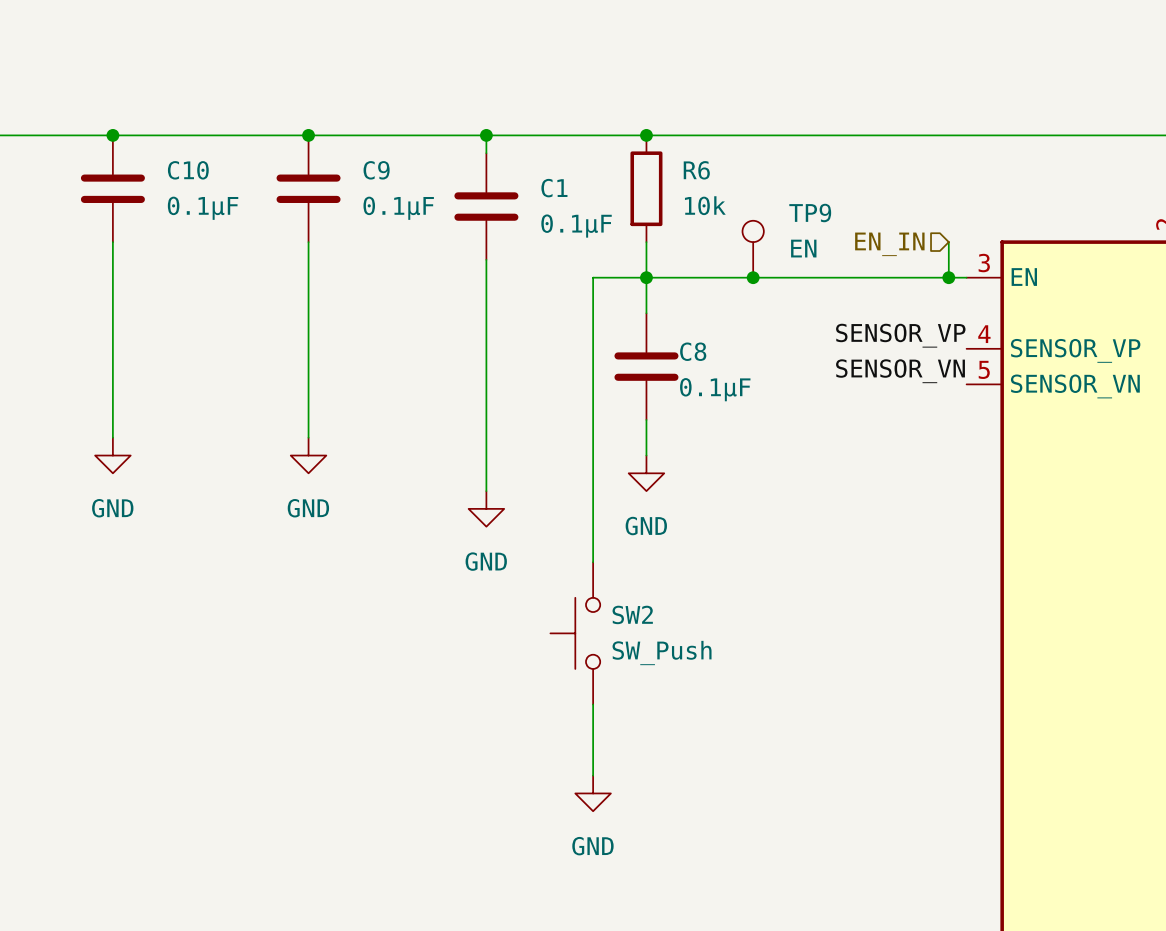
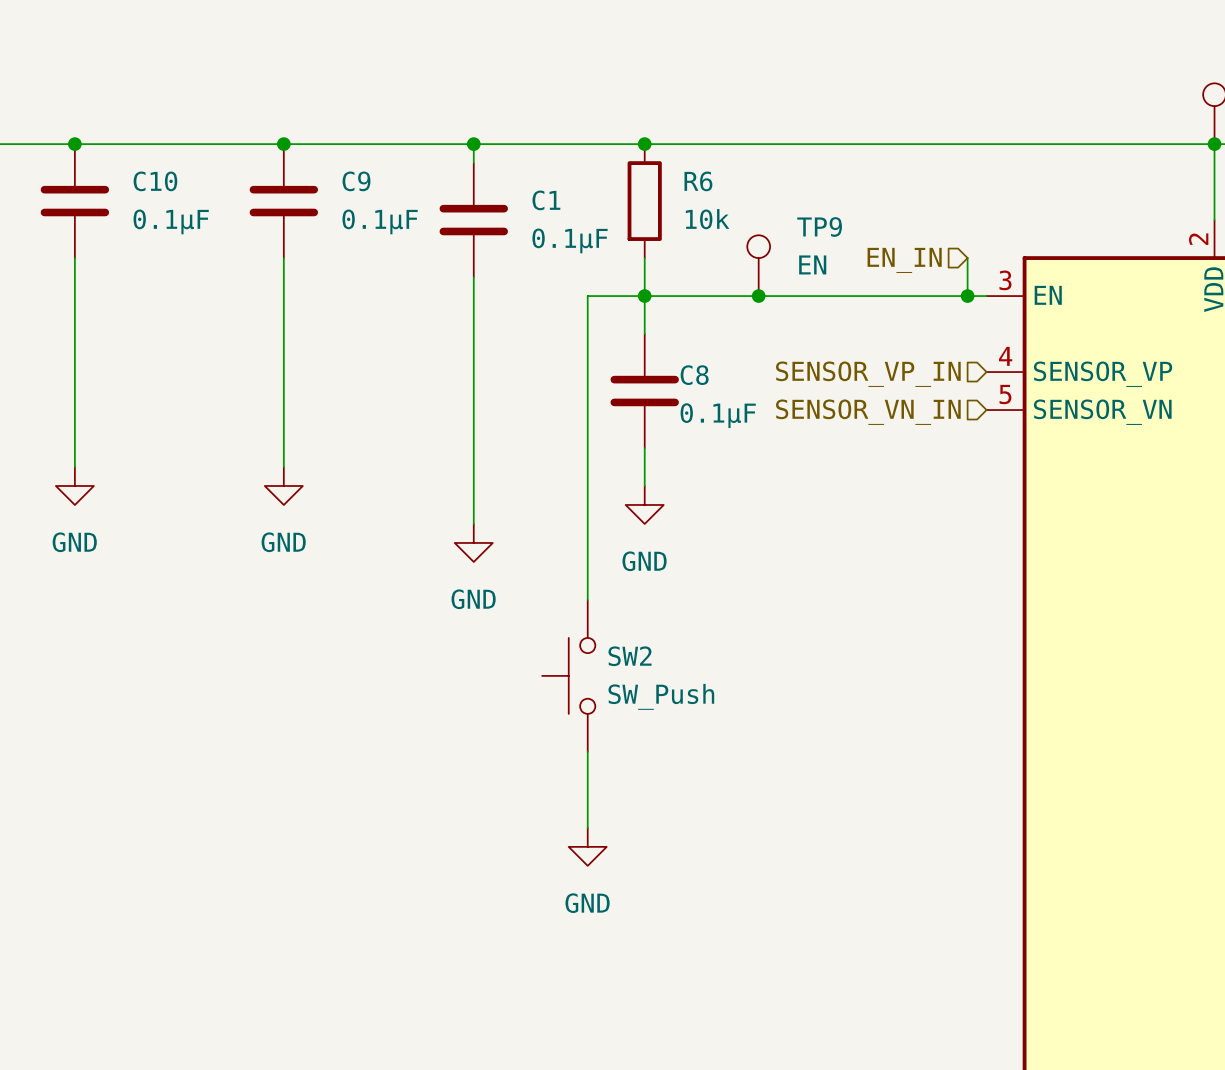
label: SENSOR_VP (900, 335) -> none
hierarchical label: none -> SENSOR_VP_IN (868, 374)
label: SENSOR_VN (900, 371) -> none
hierarchical label: none -> SENSOR_VN_IN (868, 412)

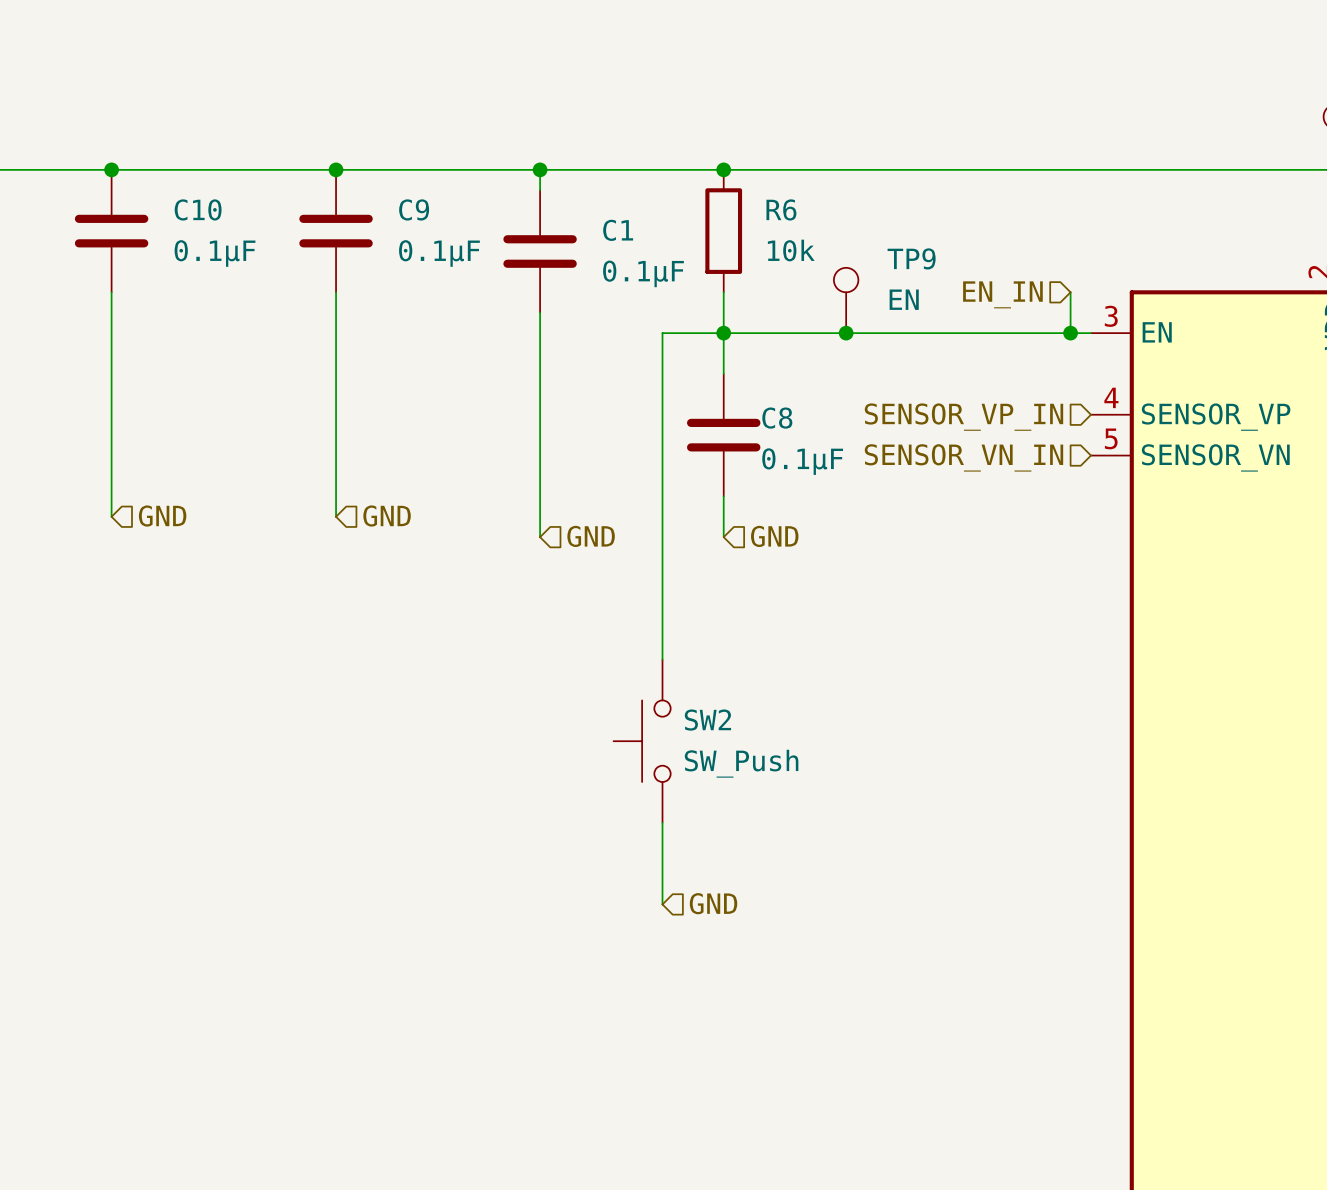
hierarchical label: none -> GND (162, 516)
hierarchical label: none -> GND (387, 516)
power symbol: GND (74, 485) -> none
power symbol: GND (283, 485) -> none
wire: (473, 485) (473, 523) -> none
hierarchical label: none -> GND (591, 536)
hierarchical label: none -> GND (774, 536)
power symbol: GND (644, 504) -> none
power symbol: GND (473, 542) -> none
hierarchical label: none -> GND (713, 903)
power symbol: GND (587, 846) -> none

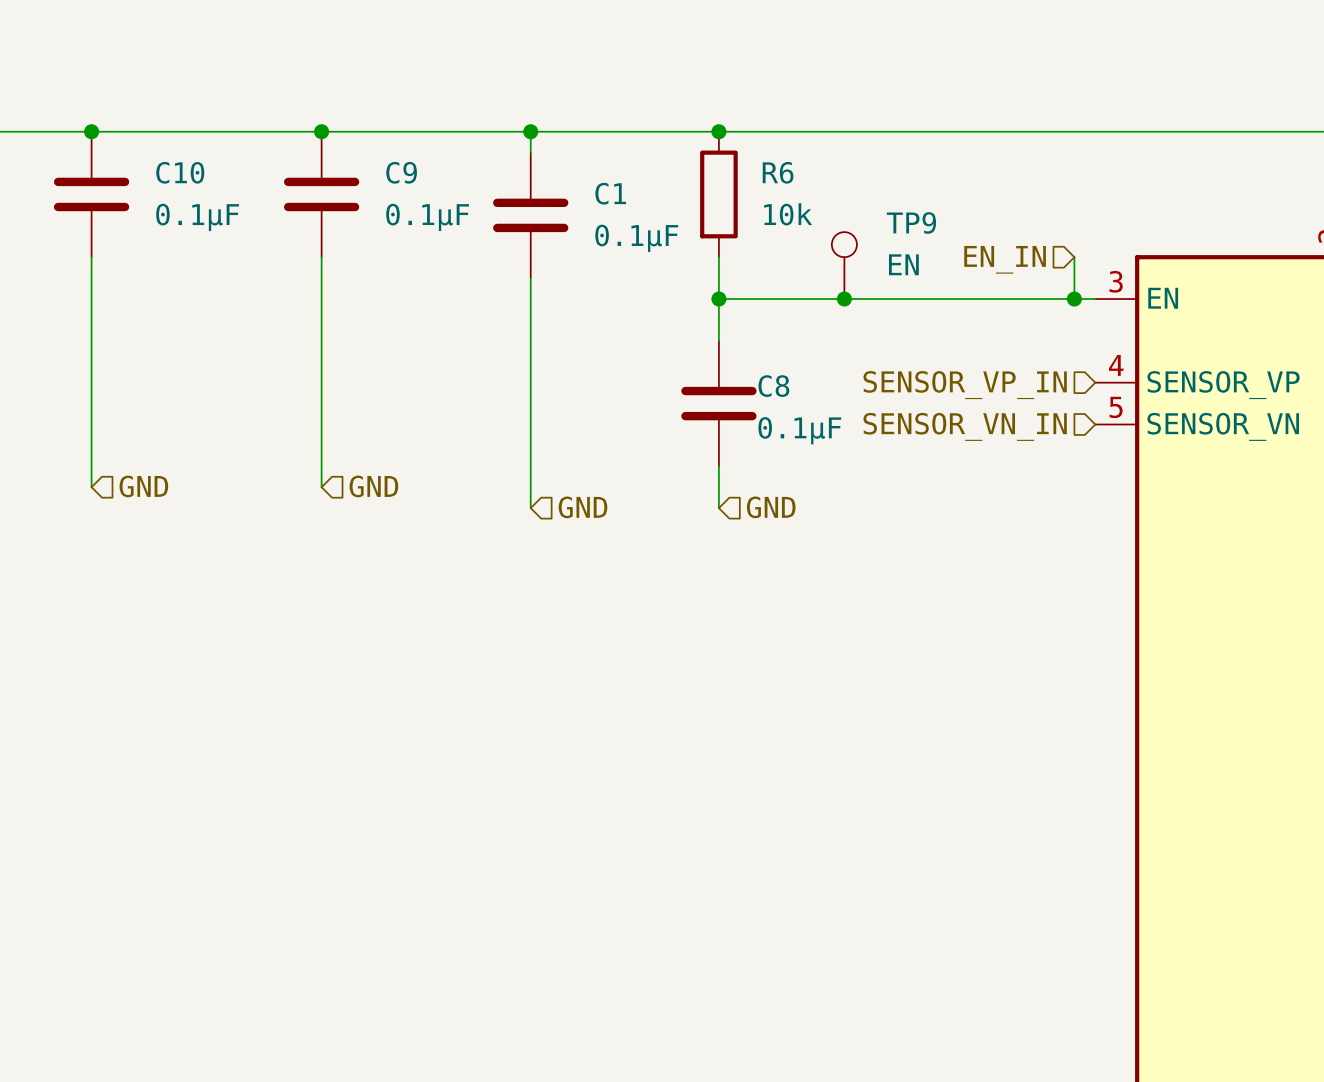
wire: (723, 333) (662, 333) (662, 659) -> none
SW2: SW_Push (642, 741) -> none
wire: (662, 822) (662, 904) -> none
hierarchical label: GND (713, 903) -> none

